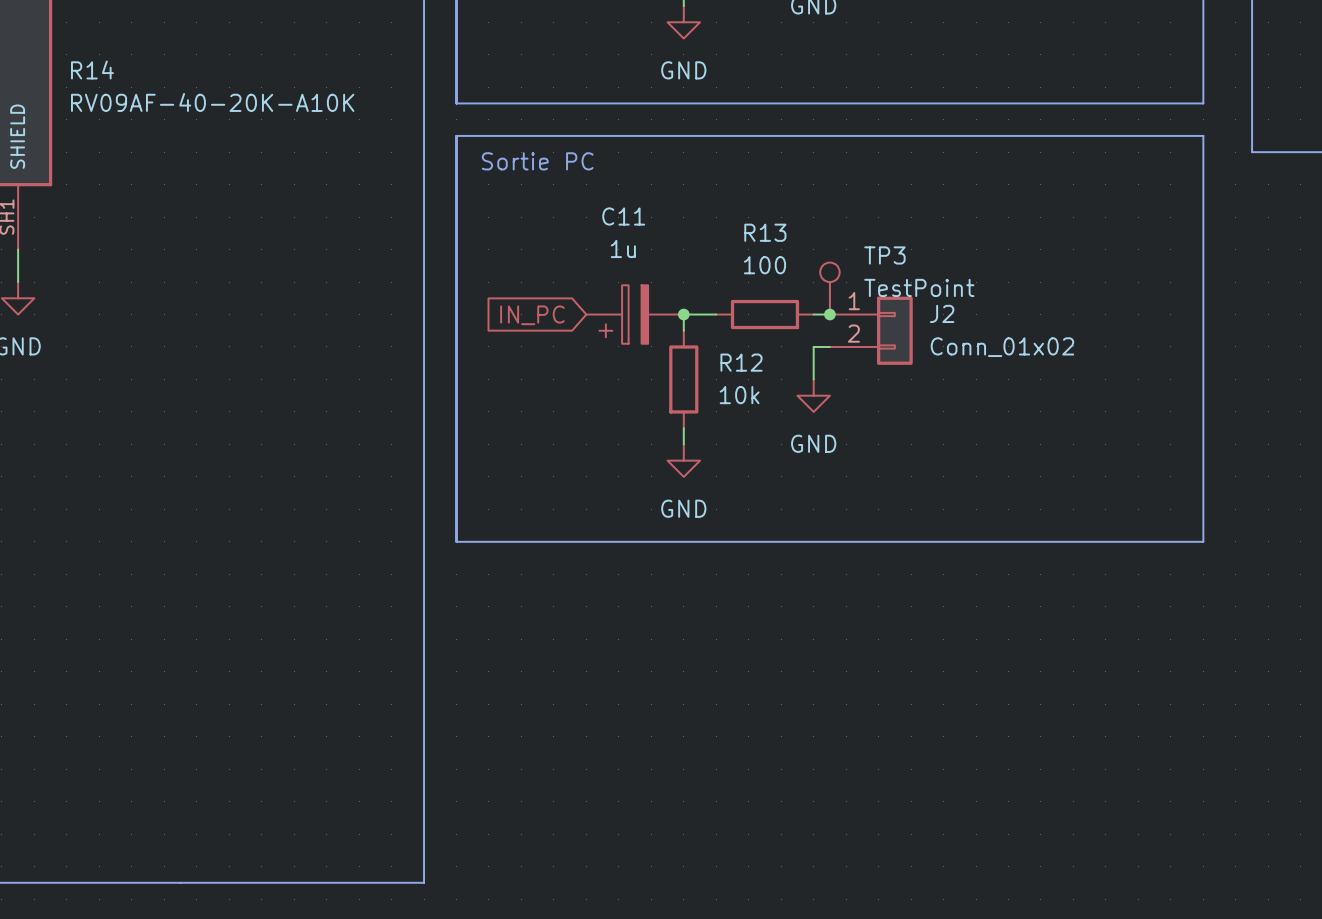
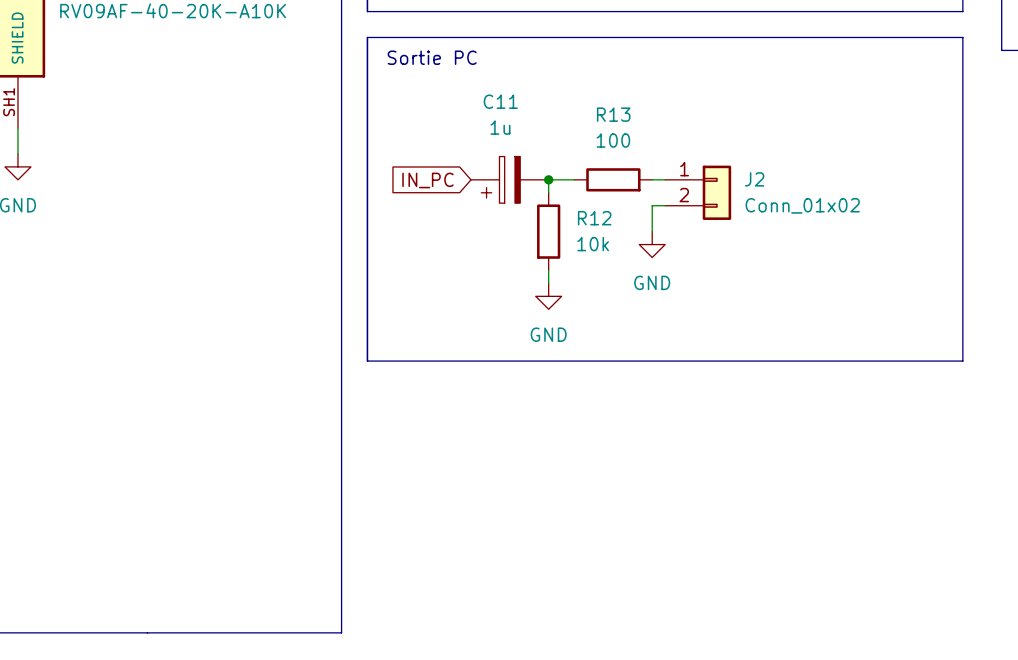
TP3: TestPoint (829, 288) -> none
junction: (829, 314) -> none

